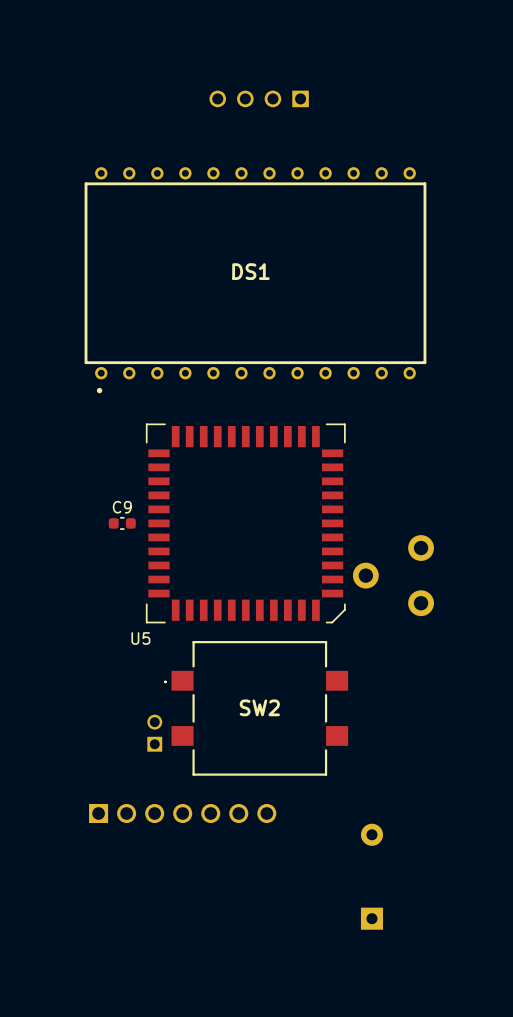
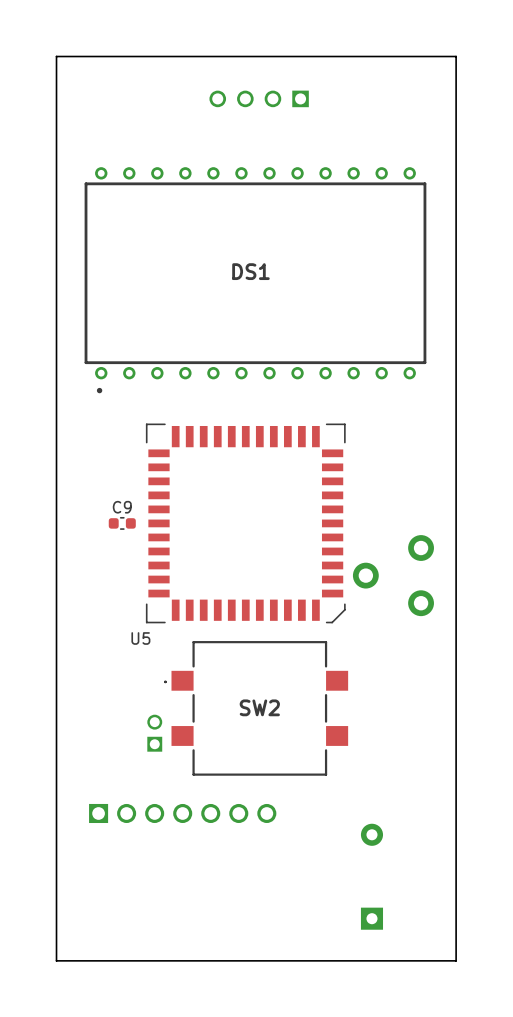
board edge: none -> (56, 56) (456, 56) (456, 960) (56, 960) (56, 56)

